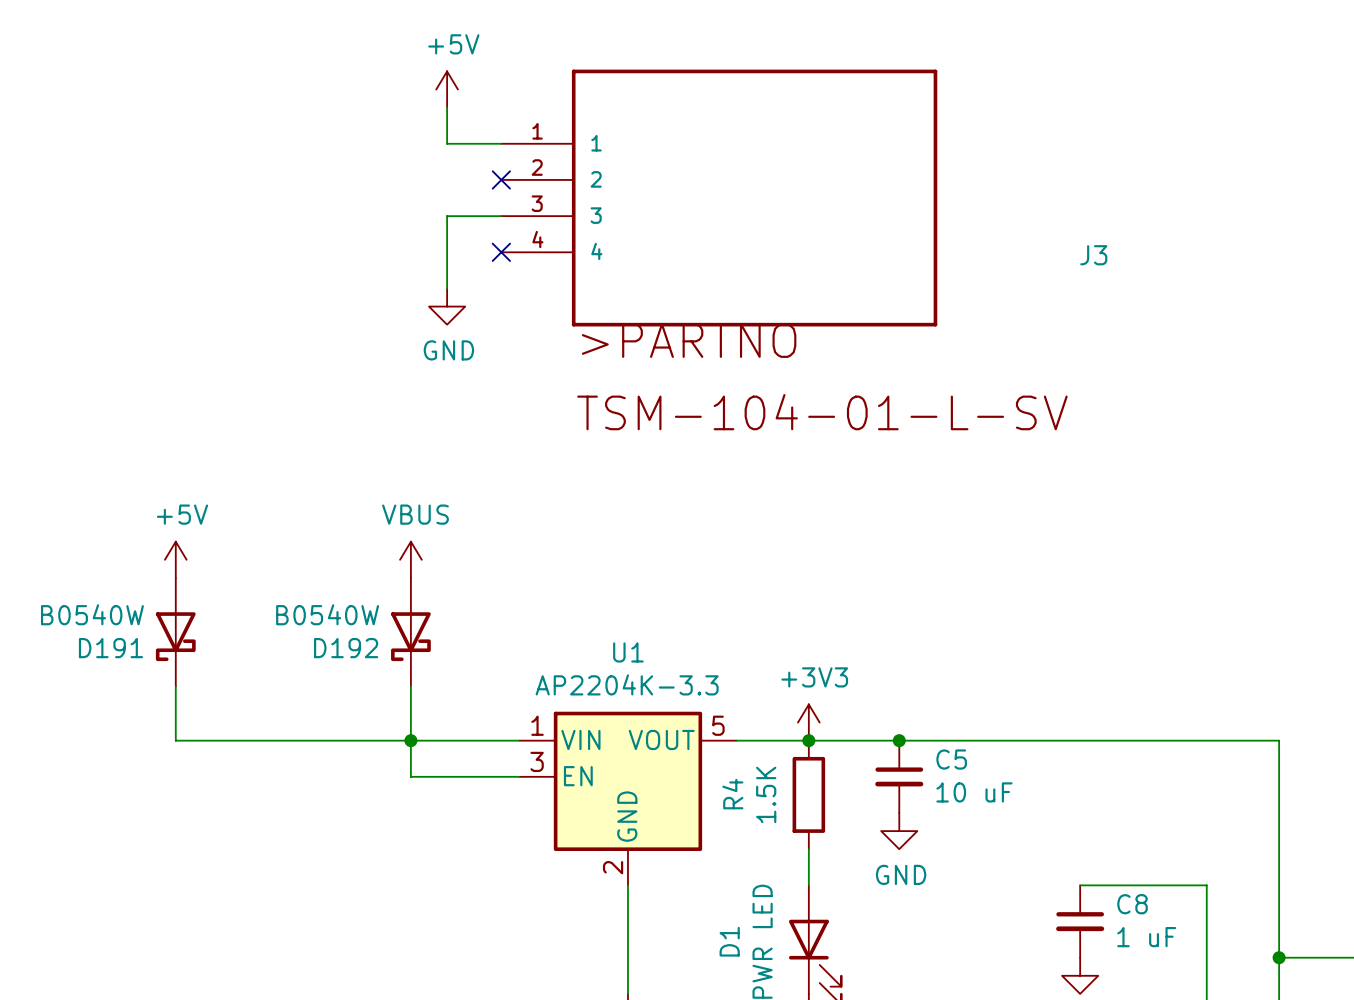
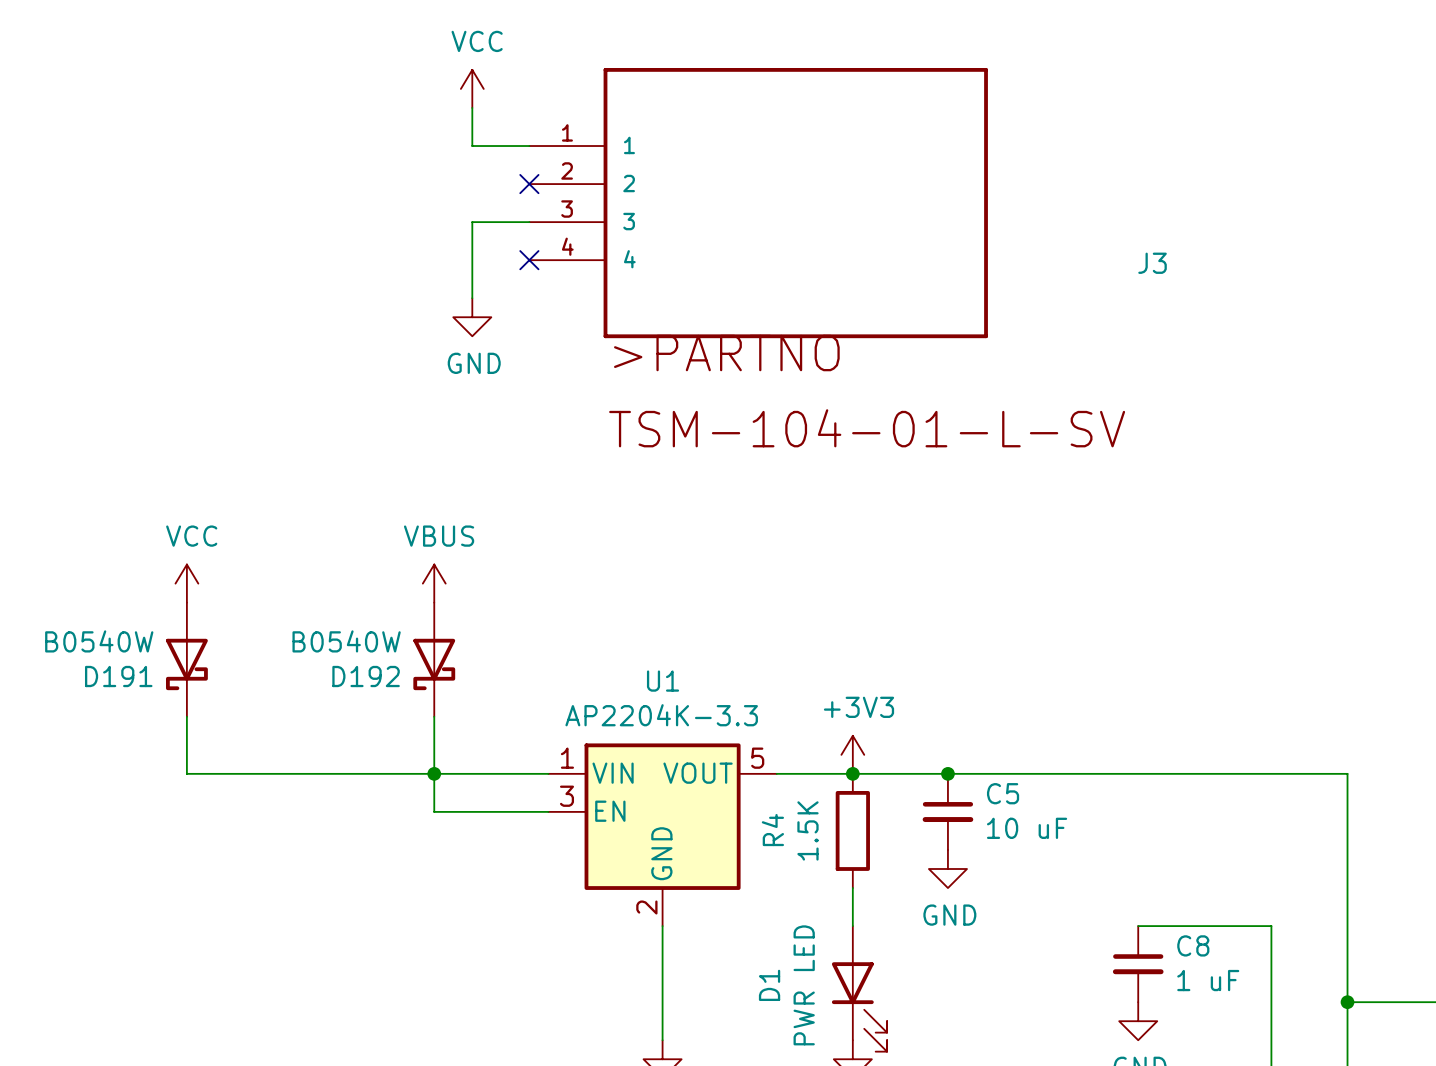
power symbol: +5V (447, 89) -> VCC (472, 88)
power symbol: +5V (175, 559) -> VCC (186, 583)

